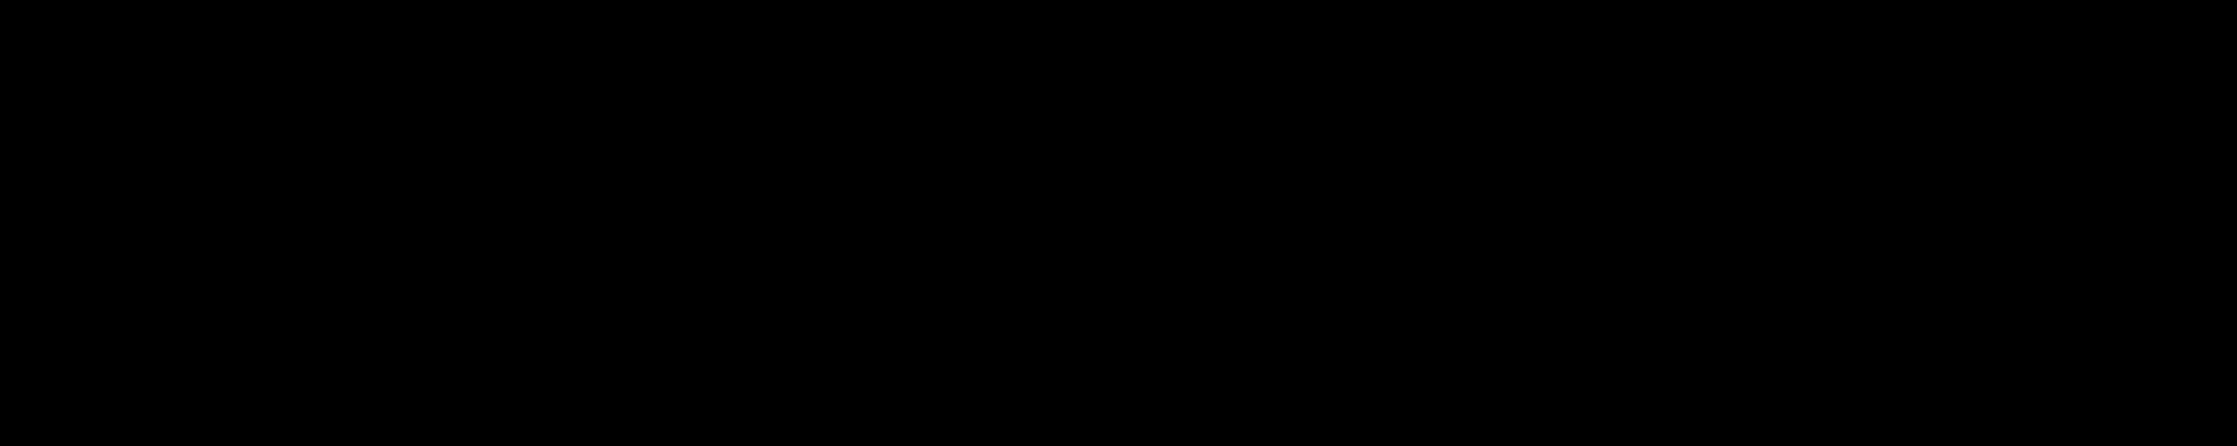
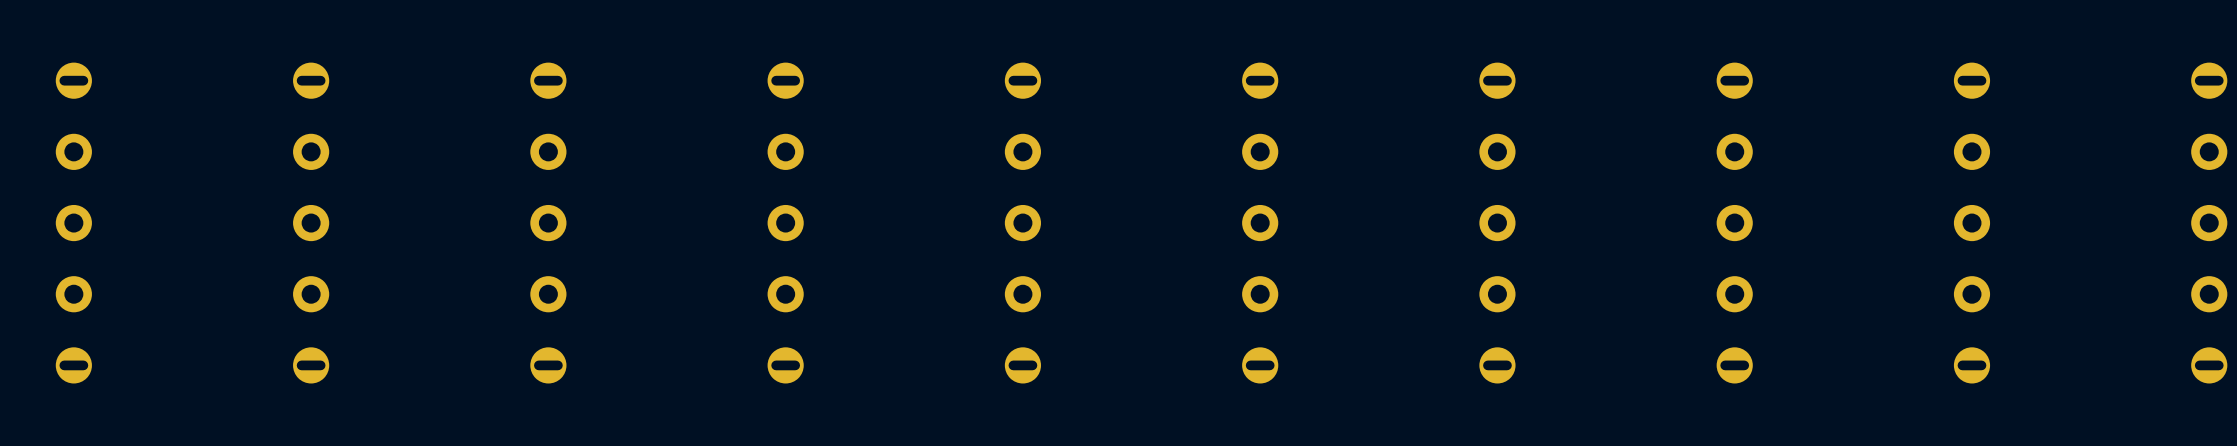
part: none -> (73, 223)
part: none -> (311, 223)
part: none -> (548, 223)
part: none -> (785, 223)
part: none -> (1022, 223)
part: none -> (1260, 223)
part: none -> (1497, 223)
part: none -> (1734, 223)
part: none -> (1971, 223)
part: none -> (2209, 223)

